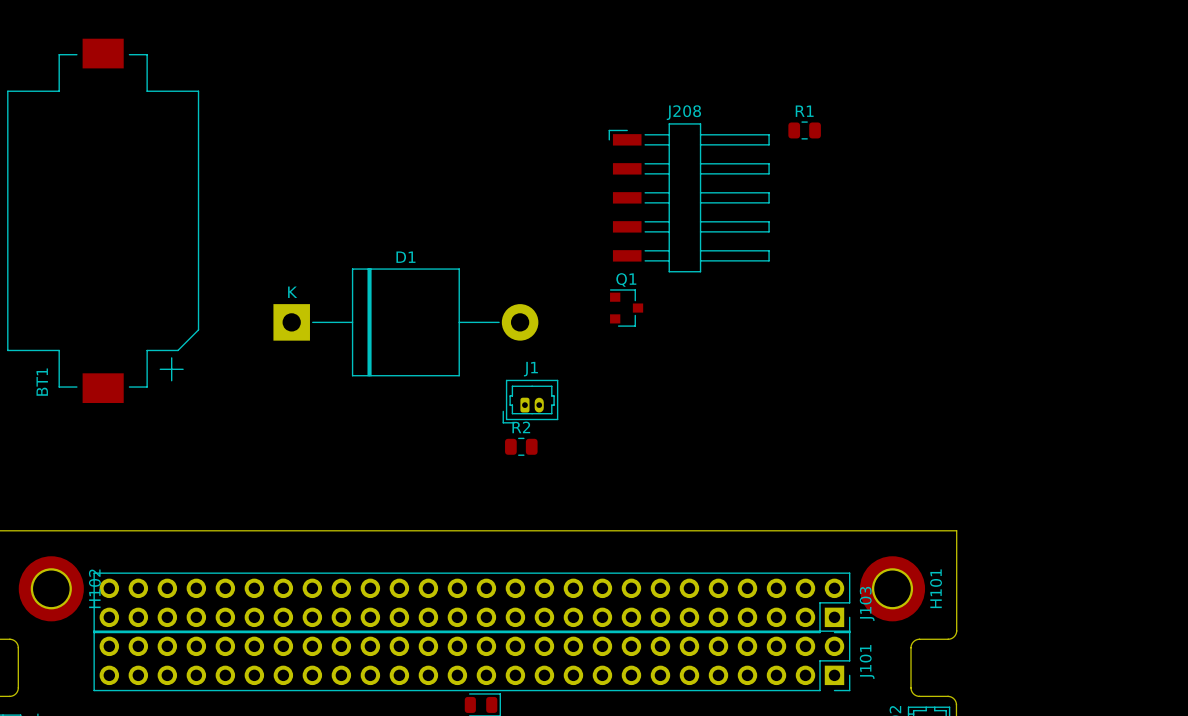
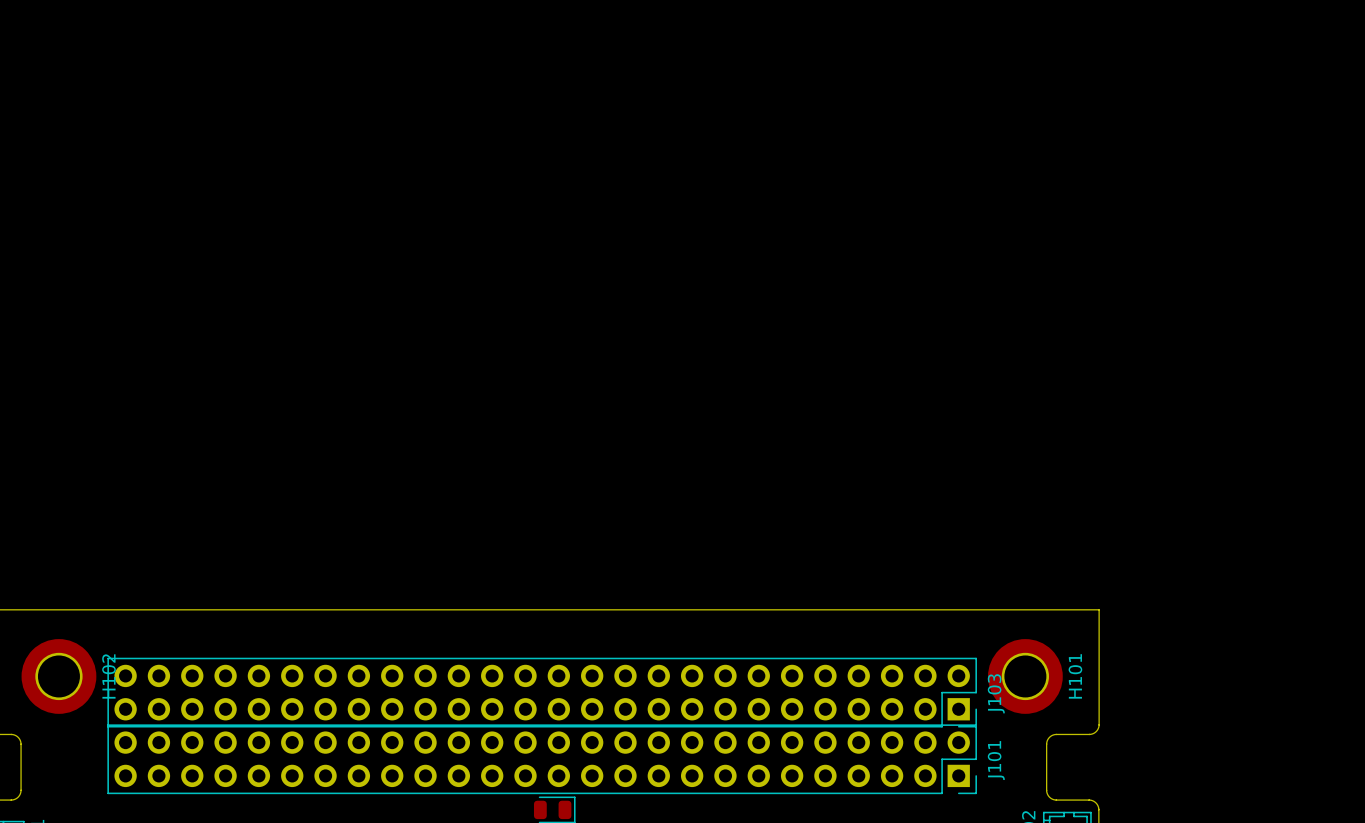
R1: (804, 130) -> none
J208: (689, 197) -> none
BT1: (103, 220) -> none
Q1: (626, 308) -> none
D1: (405, 322) -> none
J1: (530, 401) -> none
R2: (521, 446) -> none

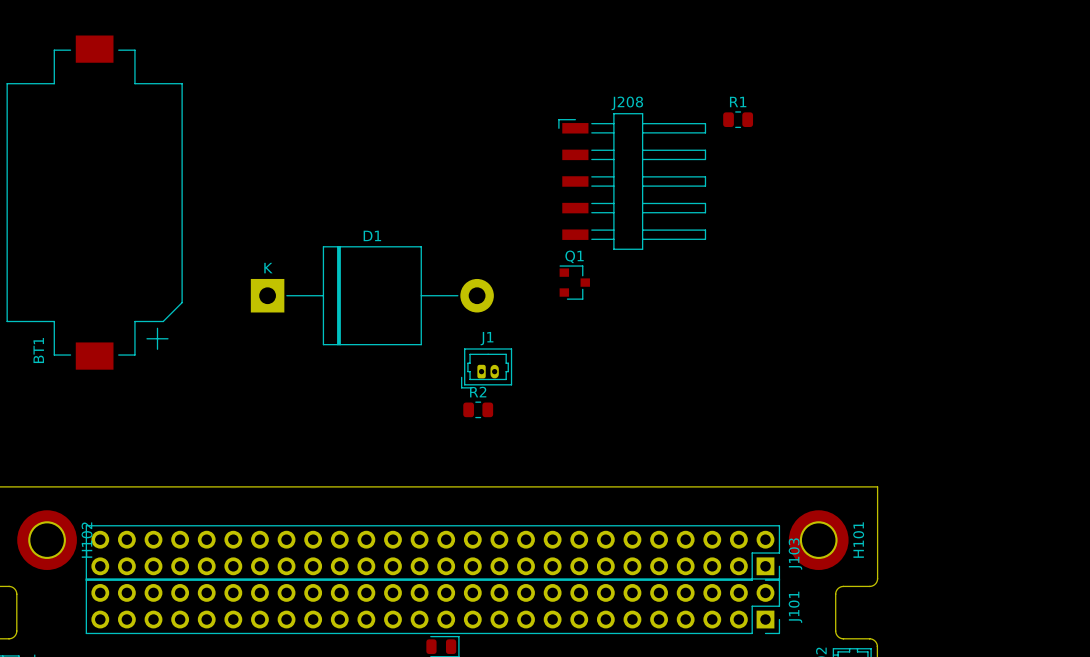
R1: none -> (738, 119)
J208: none -> (632, 181)
BT1: none -> (94, 202)
Q1: none -> (574, 282)
D1: none -> (372, 295)
J1: none -> (486, 368)
R2: none -> (478, 409)

